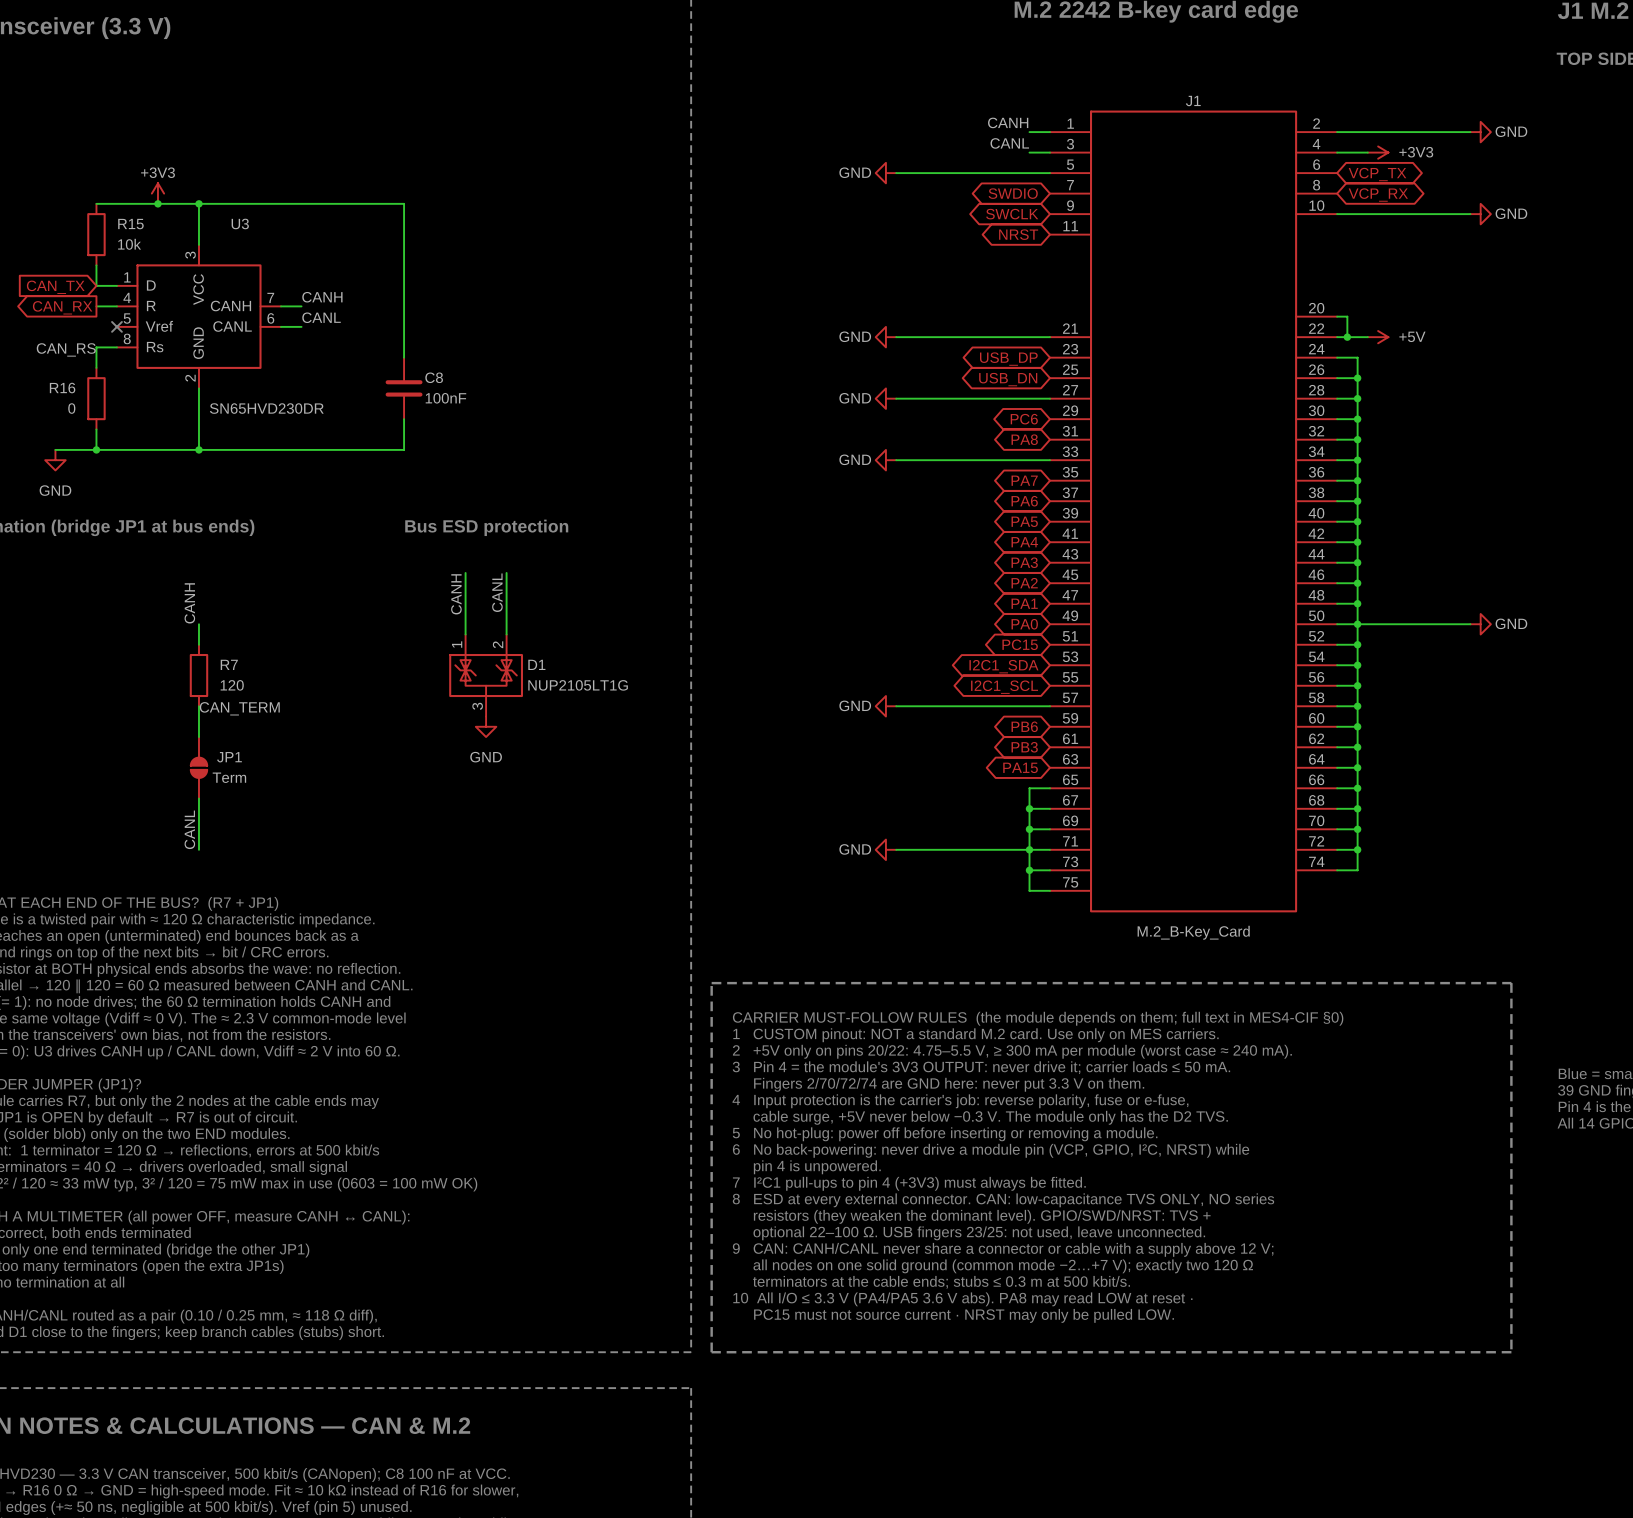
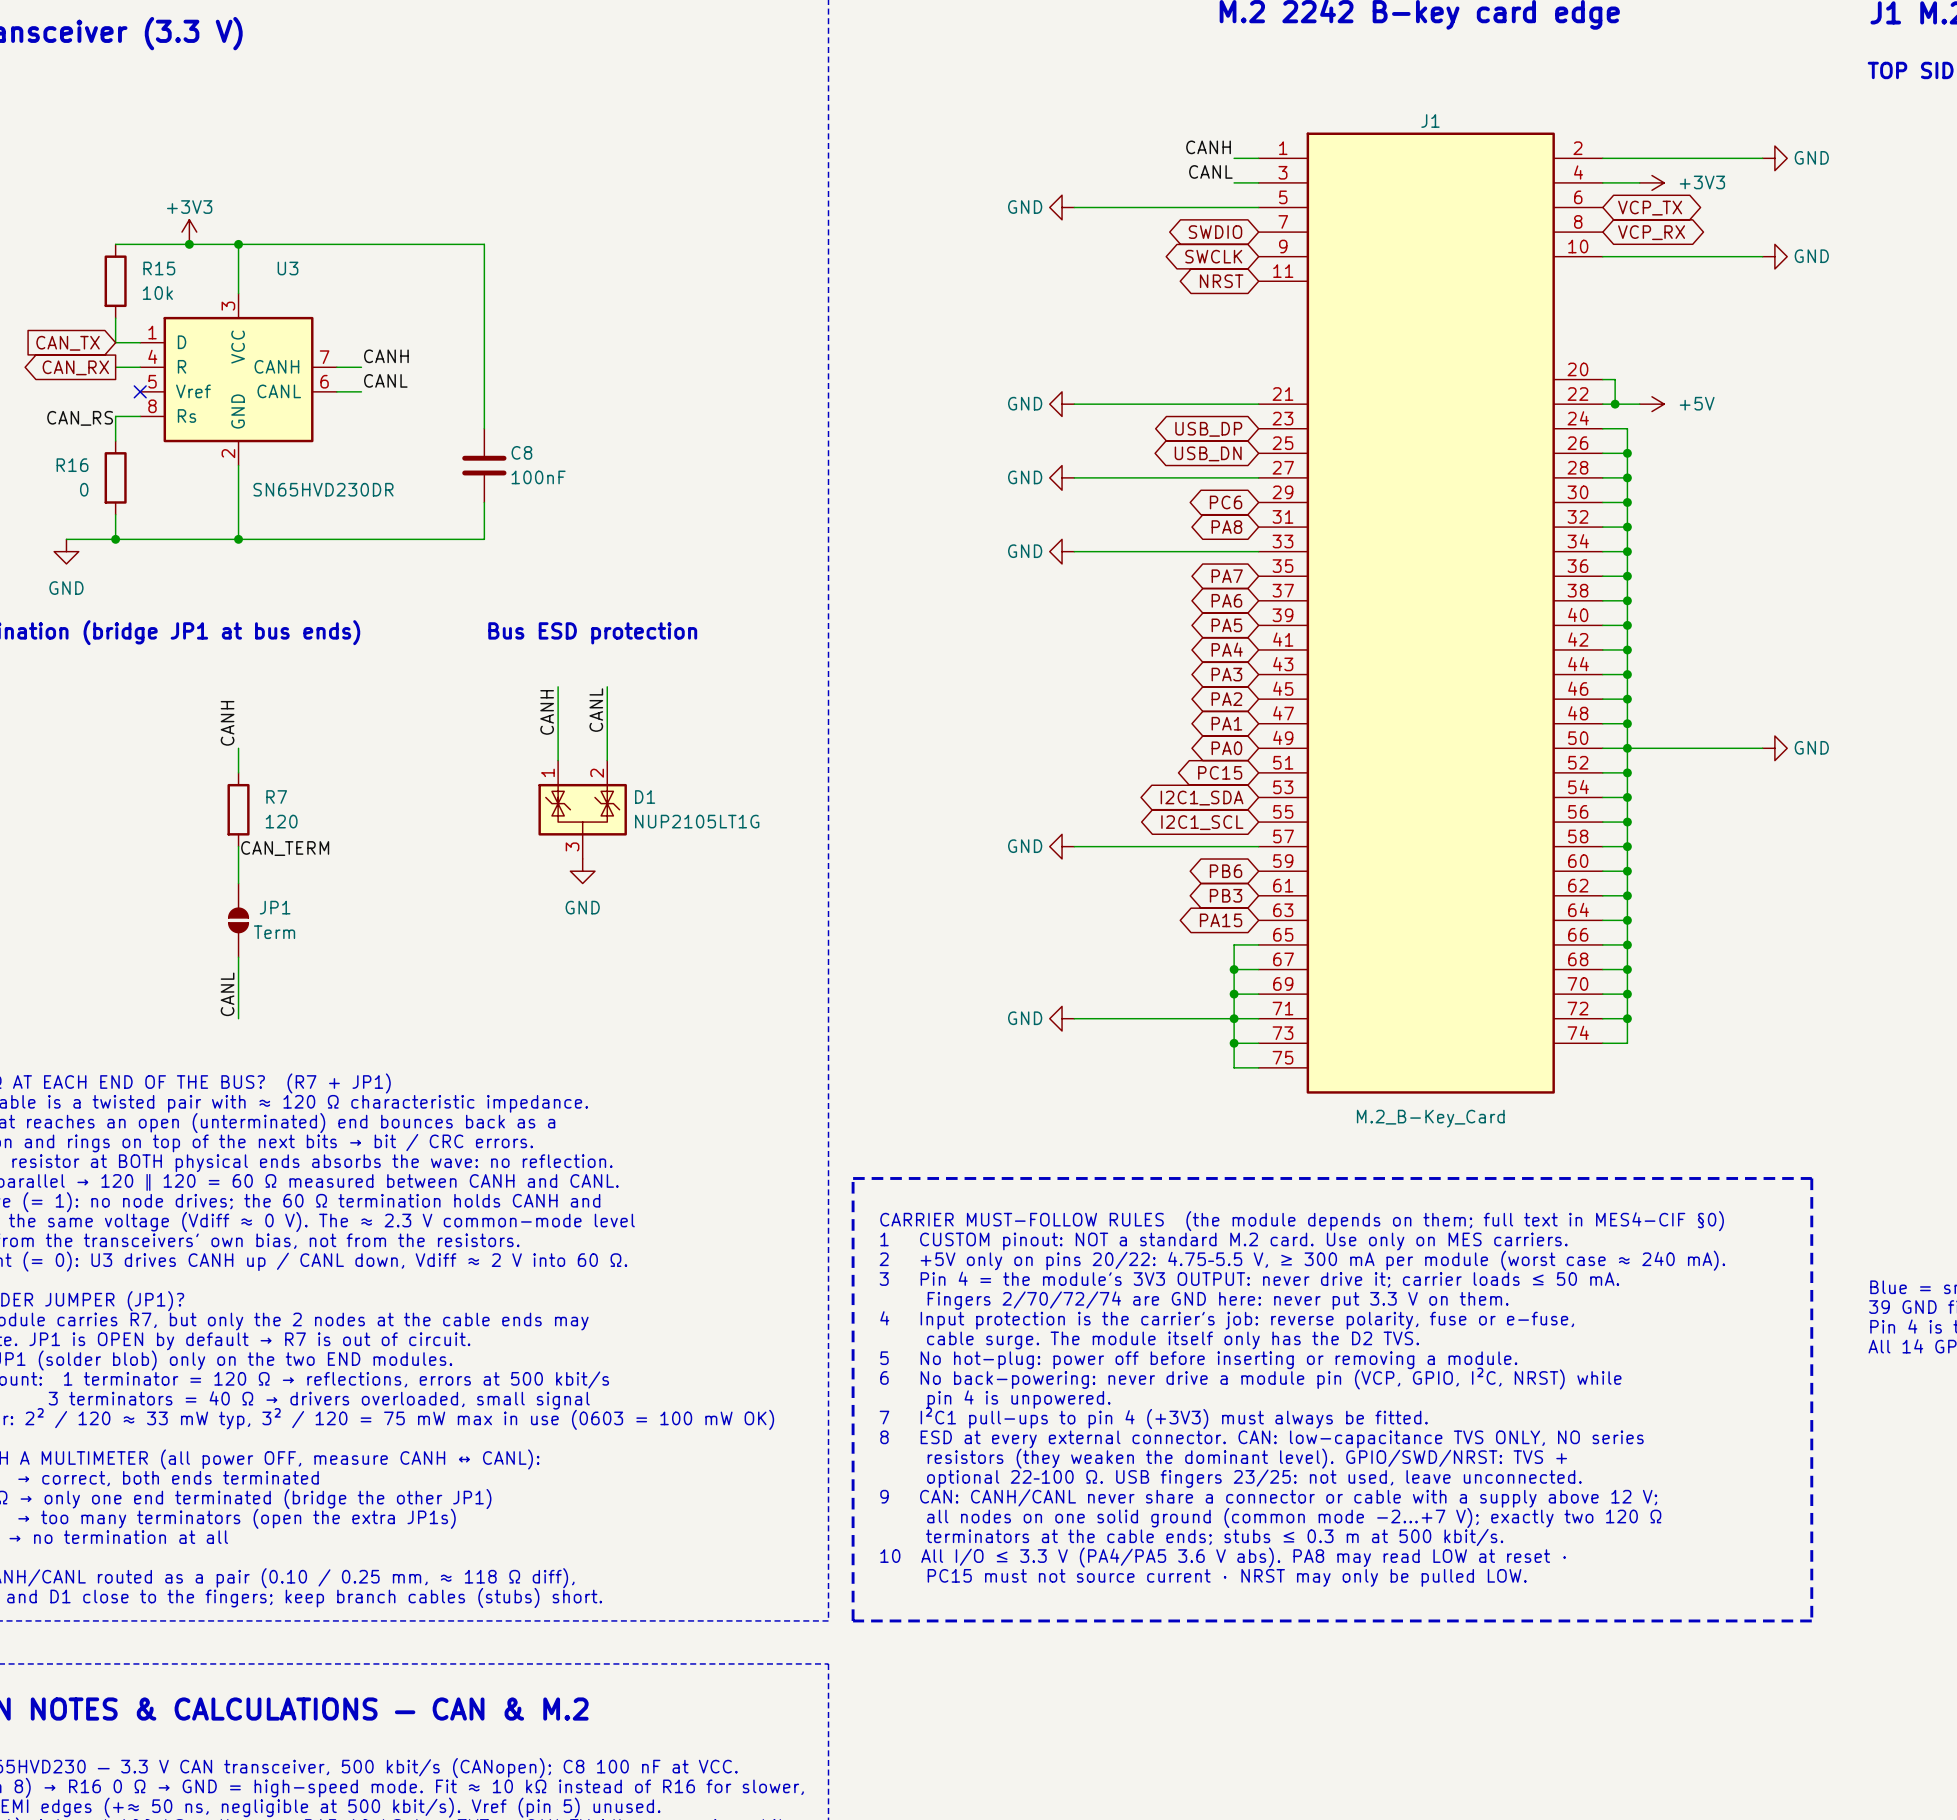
text: cable surge, +5V never below −0.3 V. The module only has the D2 TVS. (990, 1117) -> cable surge. The module itself only has the D2 TVS. (1173, 1340)

